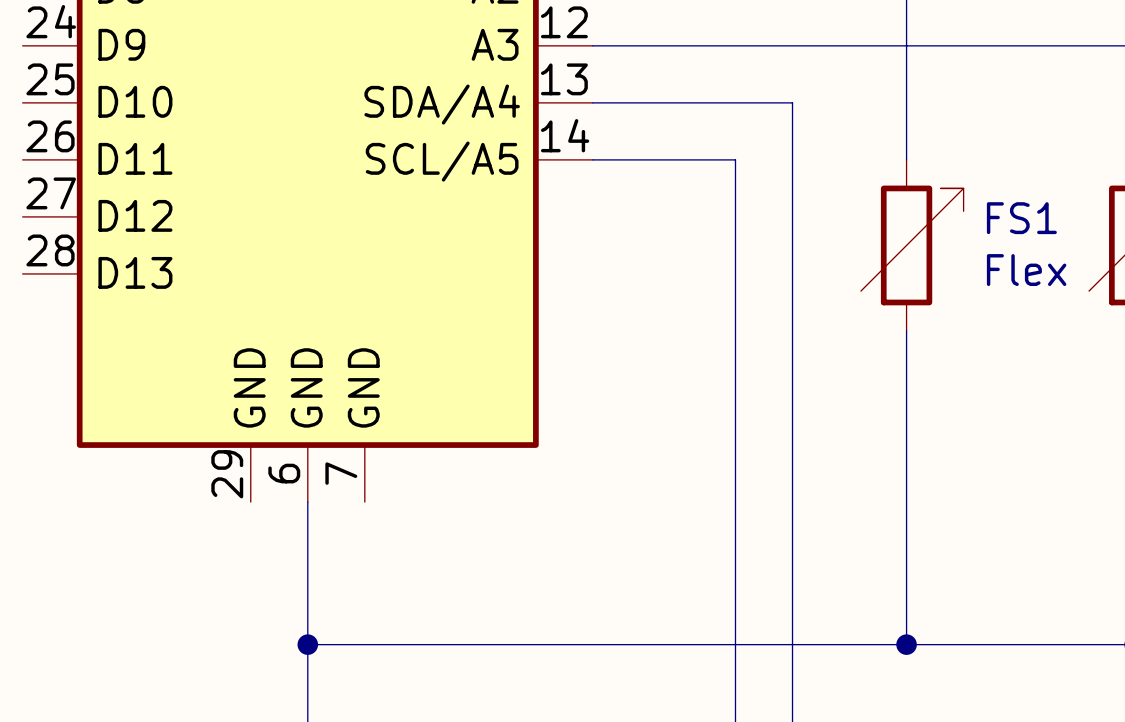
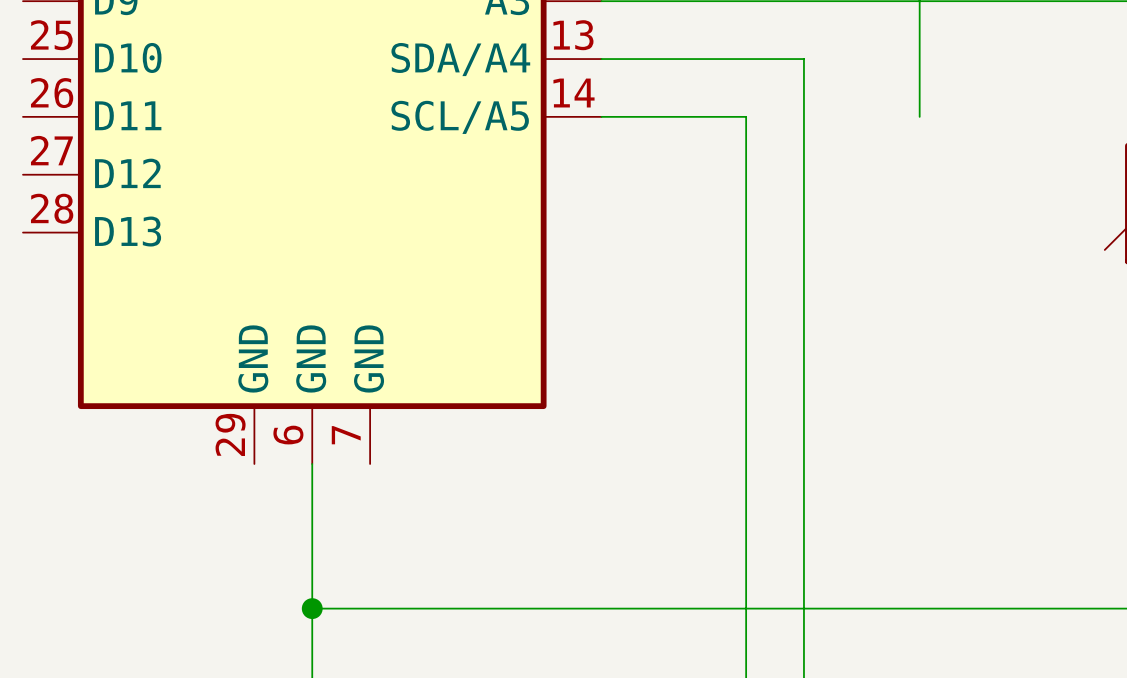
FS1: Flex (912, 245) -> none
wire: (906, 330) (906, 644) -> none
junction: (906, 644) -> none

